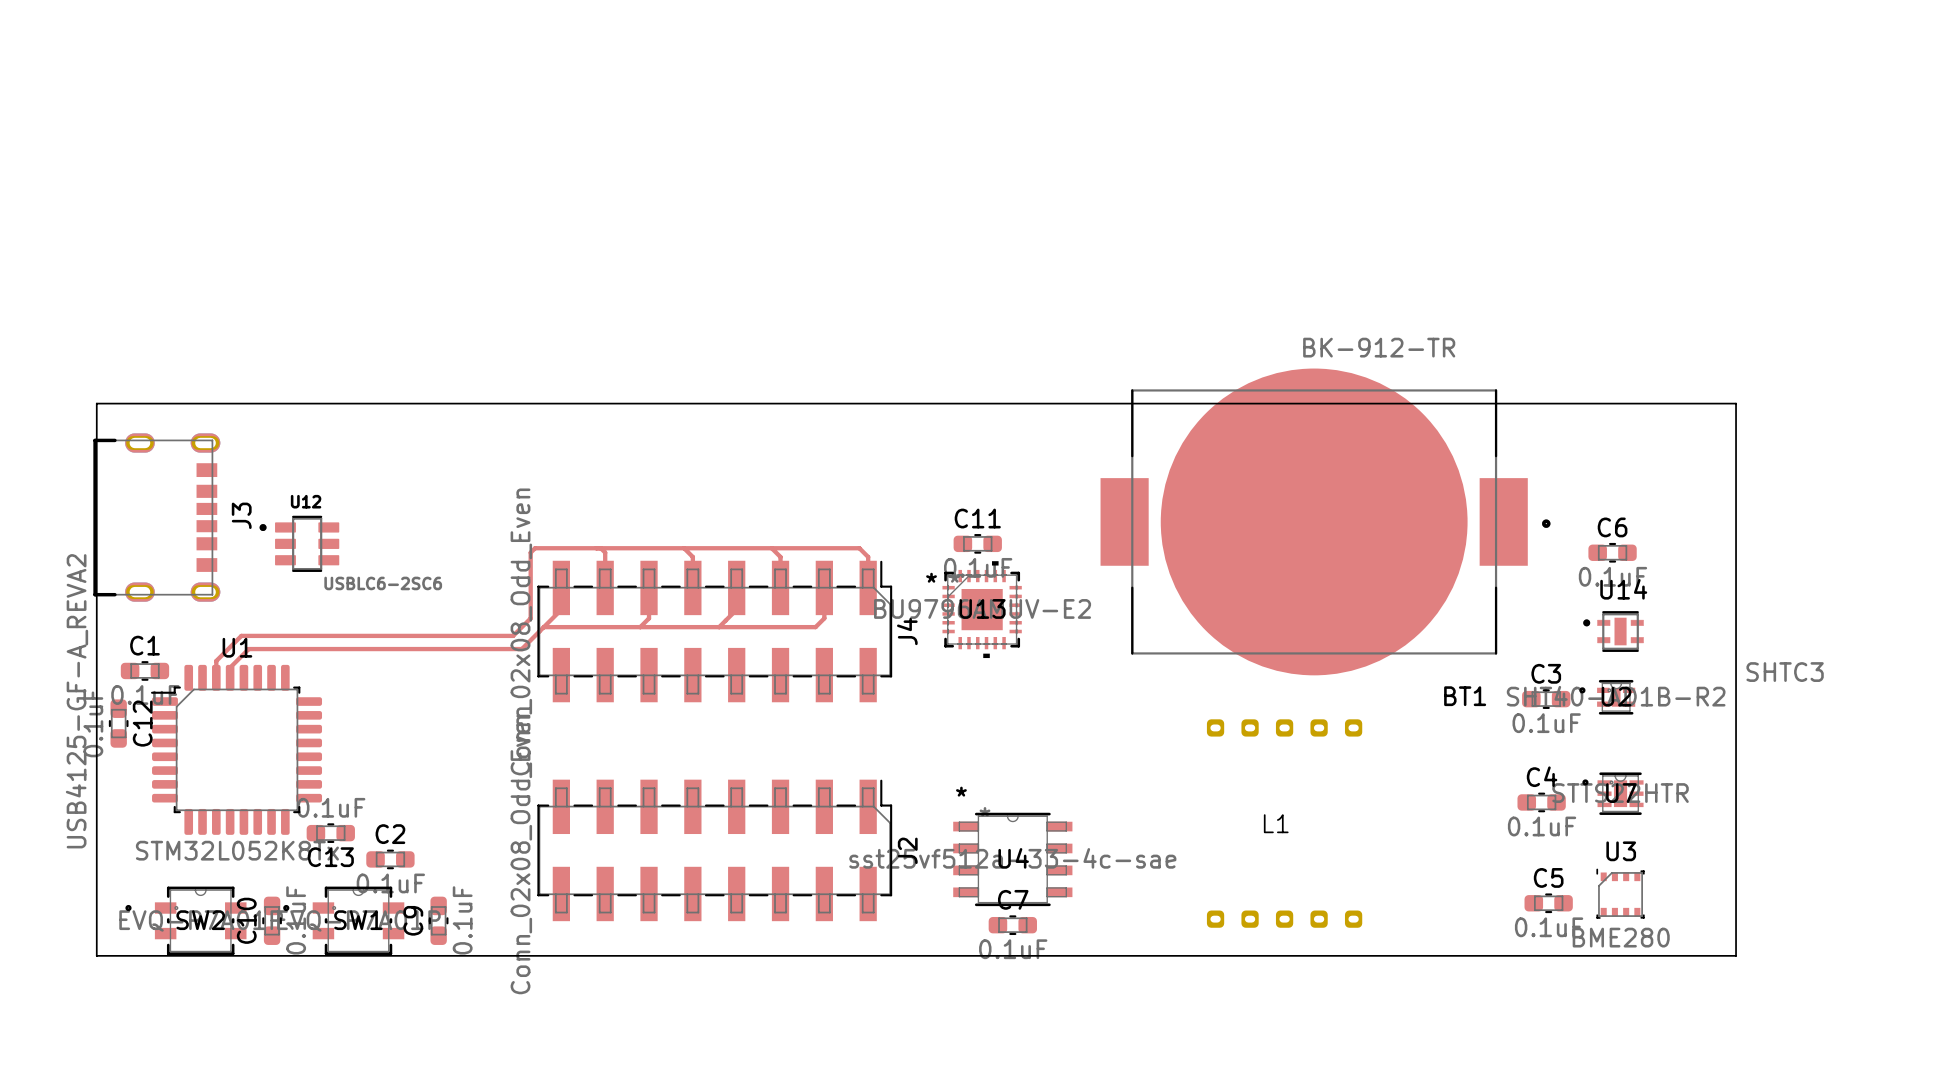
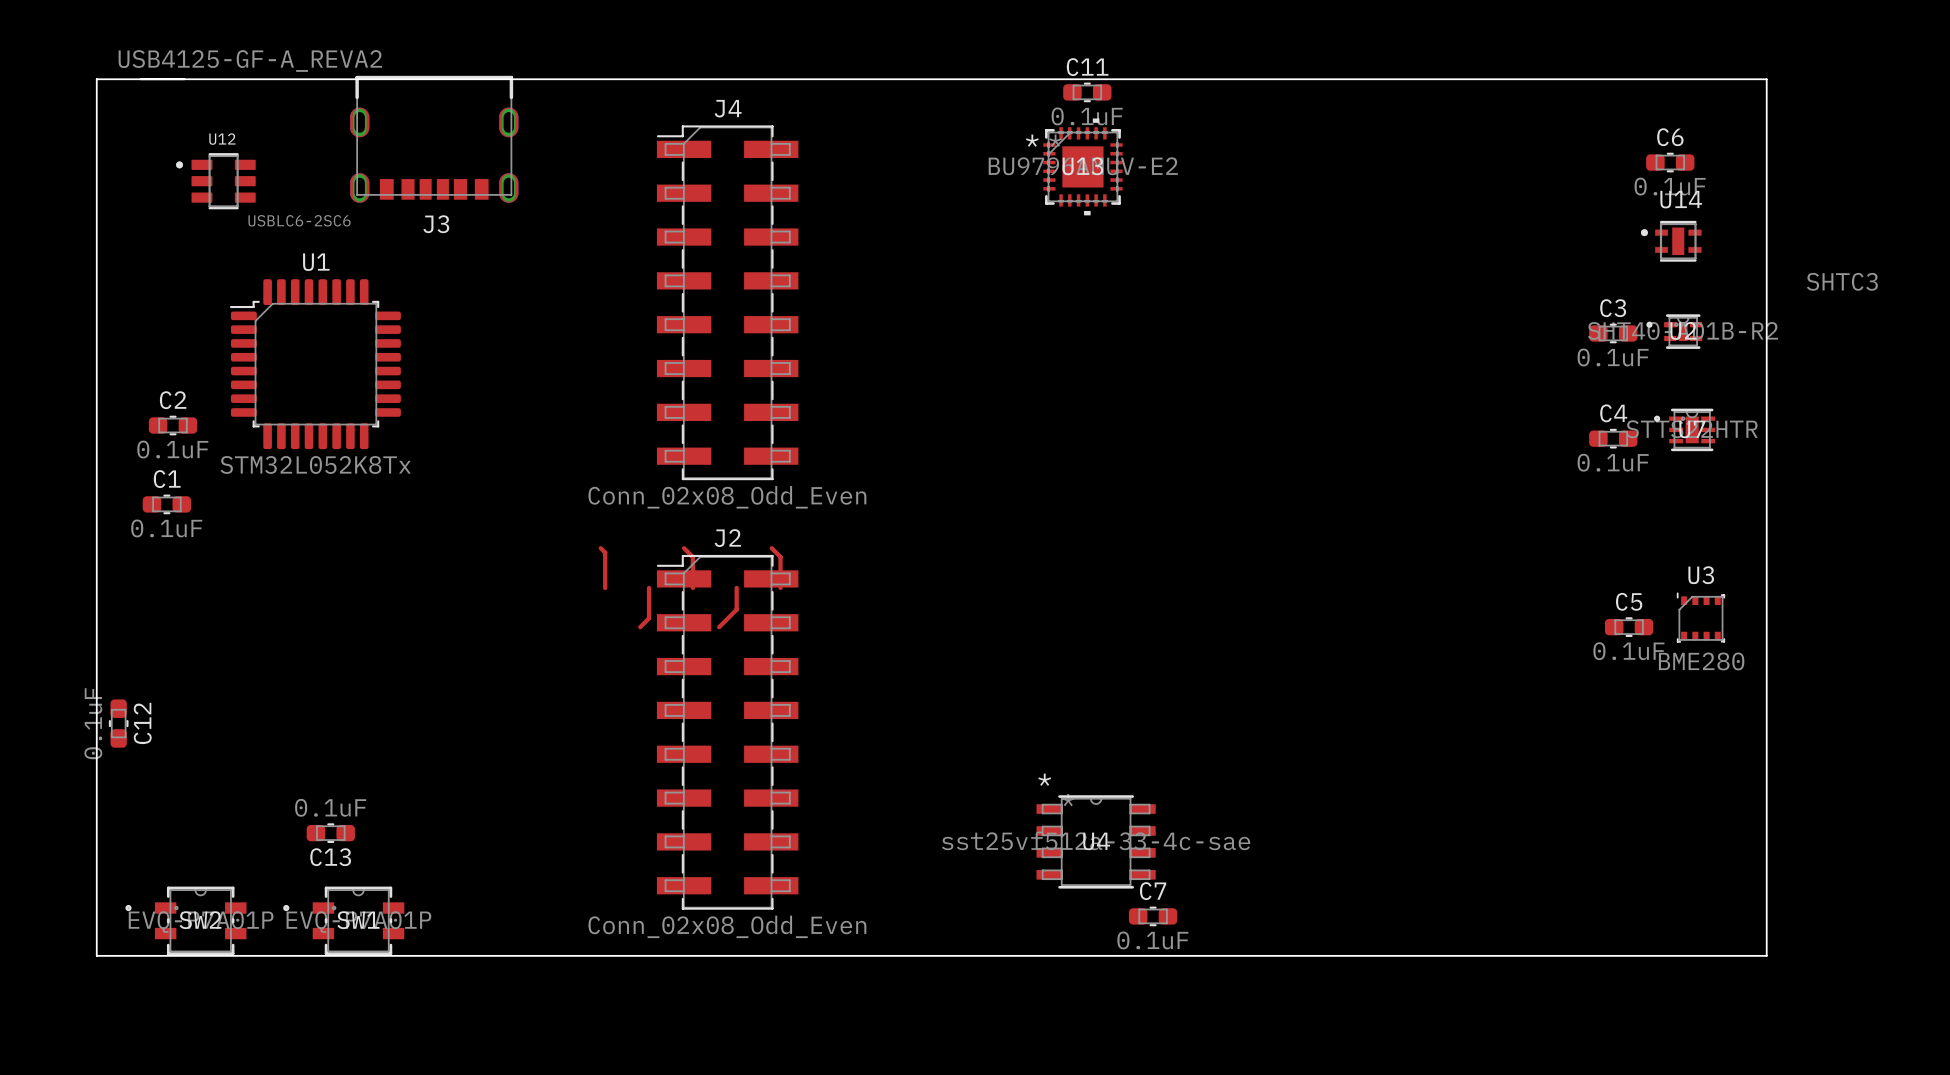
board edge: (96, 403) (1736, 403) (1736, 955) -> (96, 403) (96, 79) (1766, 79) (1766, 955) (1736, 955)
J3 rotation: 0° (156, 517) -> 90° clockwise (434, 139)
J3 position: (156, 517) -> (434, 139)
BT1: BK-912-TR (1325, 521) -> none
U12 position: (299, 543) -> (215, 181)
C11 position: (977, 543) -> (1087, 92)
C6 position: (1612, 552) -> (1670, 162)
top track: (561, 587) (561, 609) (521, 649) (248, 649) (230, 667) (230, 677) -> none
top track: (824, 587) (824, 618) (815, 627) (543, 627) -> none
top track: (868, 587) (868, 557) (859, 548) (535, 548) (530, 552) (530, 618) (513, 635) (241, 635) (216, 660) (216, 677) -> none
U13 position: (982, 609) -> (1082, 166)
J4 rotation: 0° (714, 631) -> 90° counterclockwise (727, 302)
J4 position: (714, 631) -> (727, 302)
U14 position: (1613, 631) -> (1671, 241)
C1 position: (144, 670) -> (166, 504)
U2 position: (1607, 697) -> (1674, 331)
C3 position: (1546, 699) -> (1613, 333)
U1 position: (236, 749) -> (315, 364)
U7 position: (1612, 793) -> (1684, 429)
C4 position: (1541, 802) -> (1613, 438)
L1: (1284, 823) -> none
J2 rotation: 0° (714, 850) -> 90° counterclockwise (727, 732)
C2 position: (390, 859) -> (173, 425)
U4 position: (1012, 859) -> (1096, 841)
U3 position: (1620, 893) -> (1700, 617)
C5 position: (1548, 903) -> (1629, 627)
C10: 0.1uF (272, 920) -> none
C9: 0.1uF (438, 920) -> none
C7 position: (1012, 925) -> (1153, 916)

